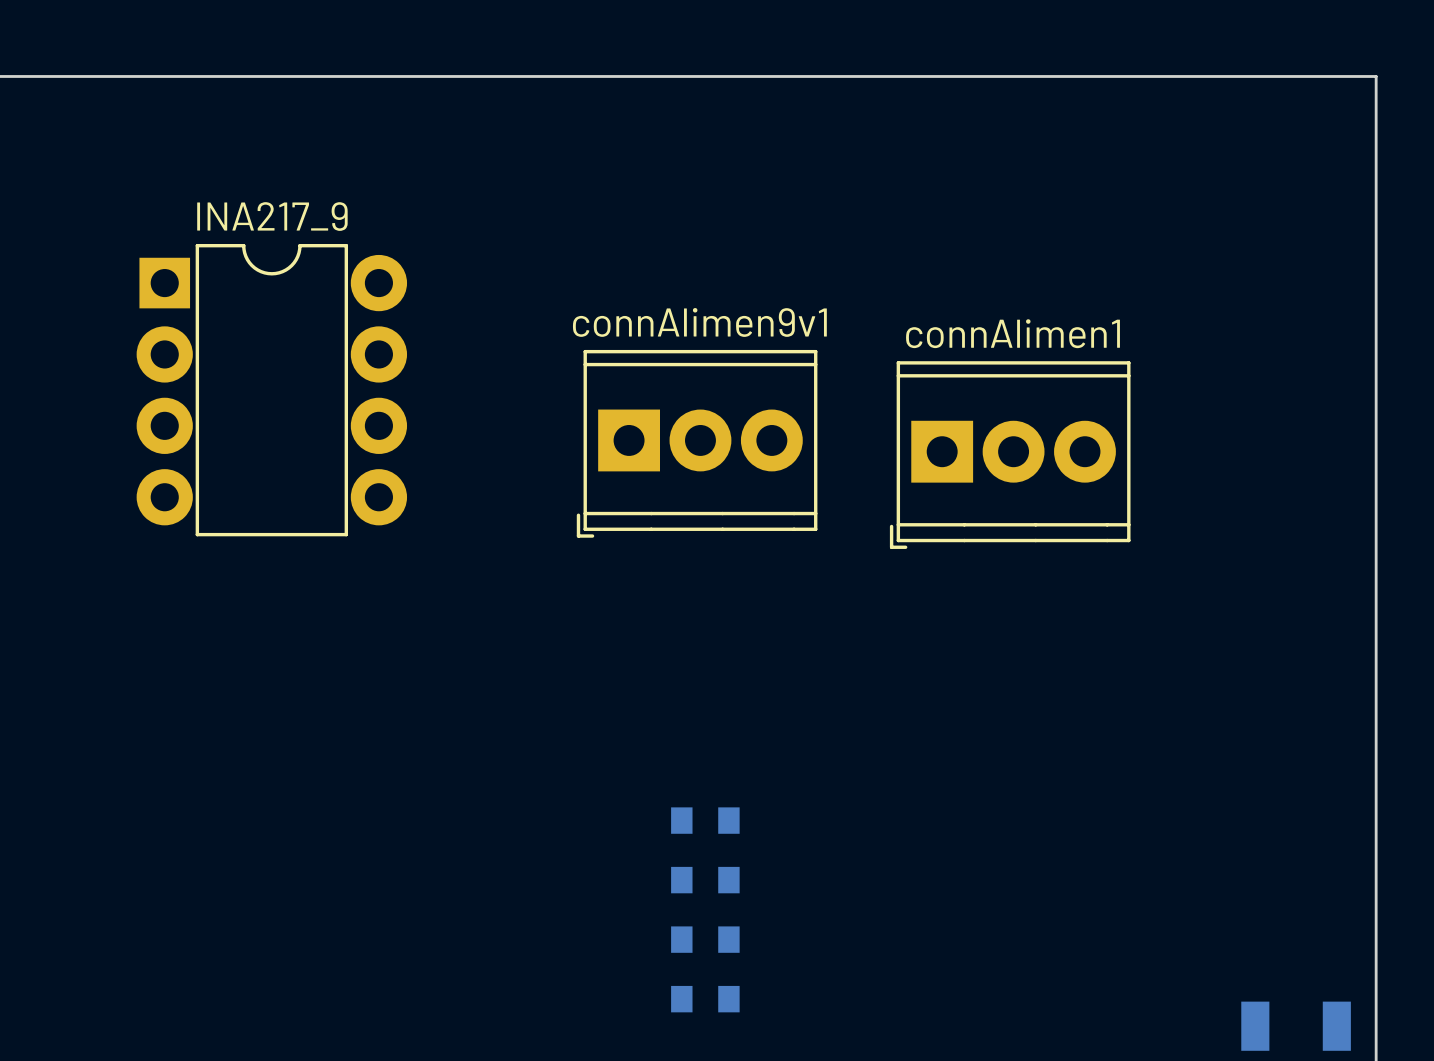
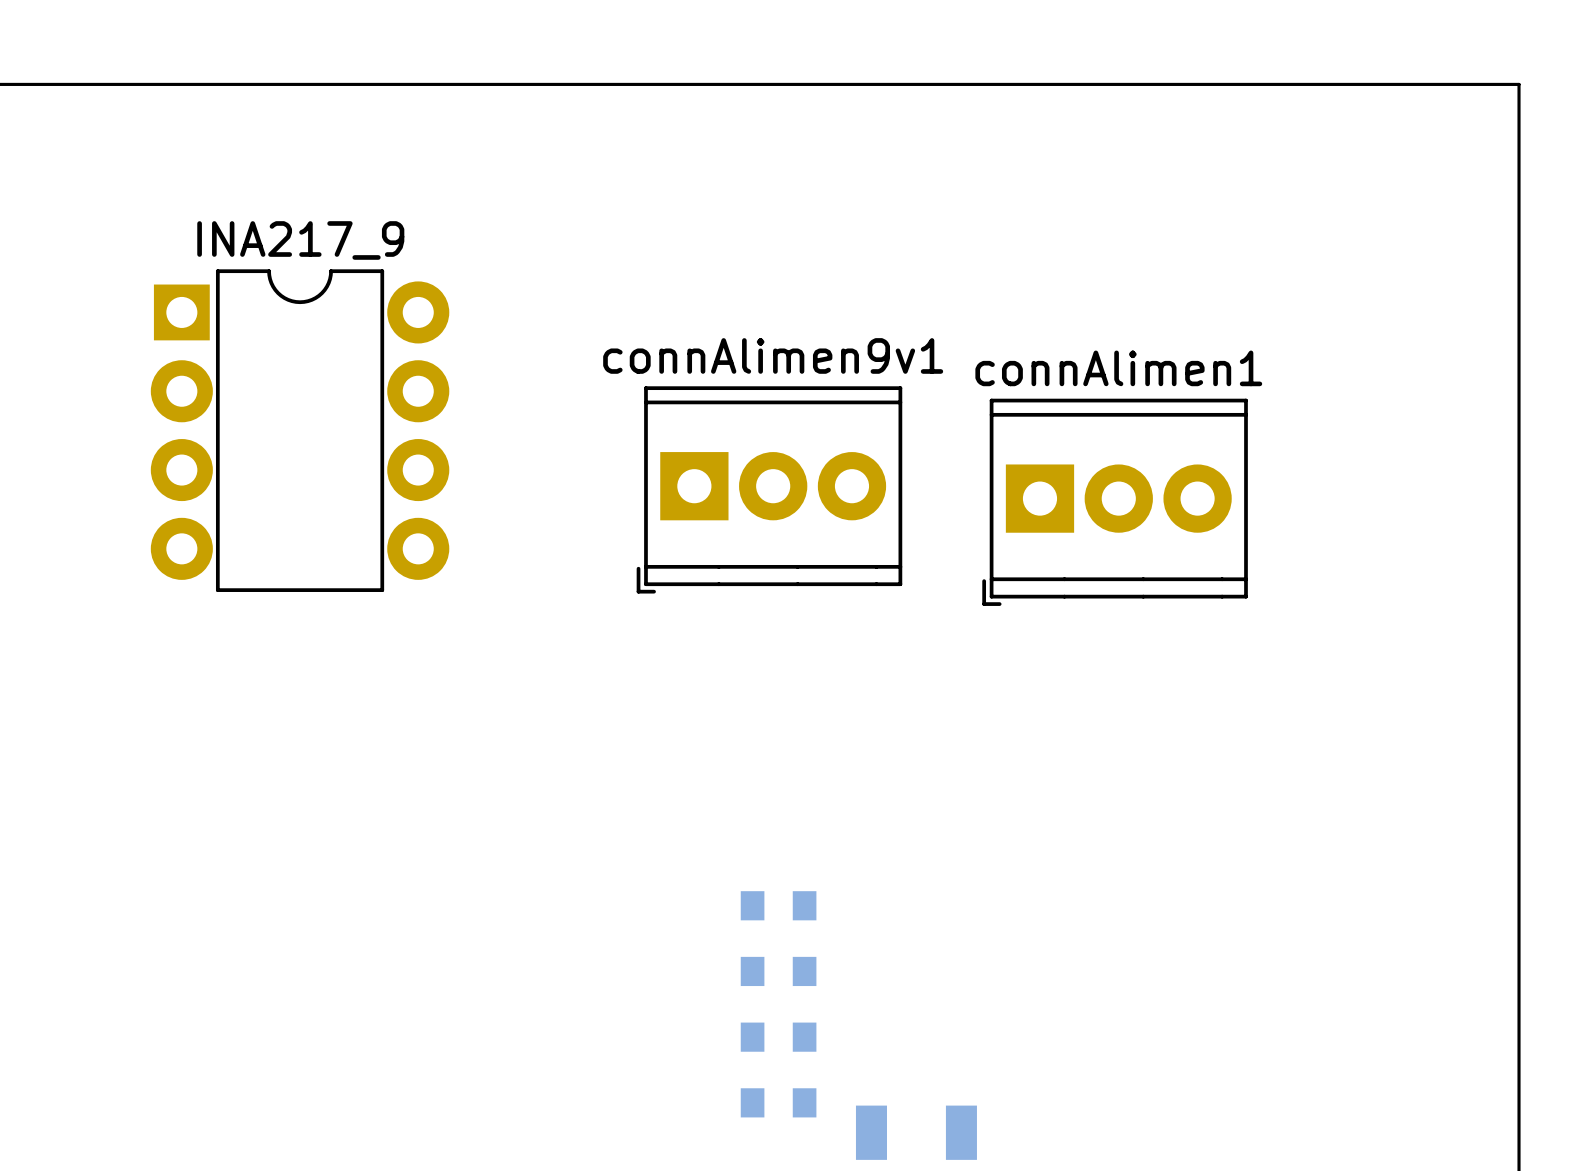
part position: (1296, 1026) -> (916, 1132)

